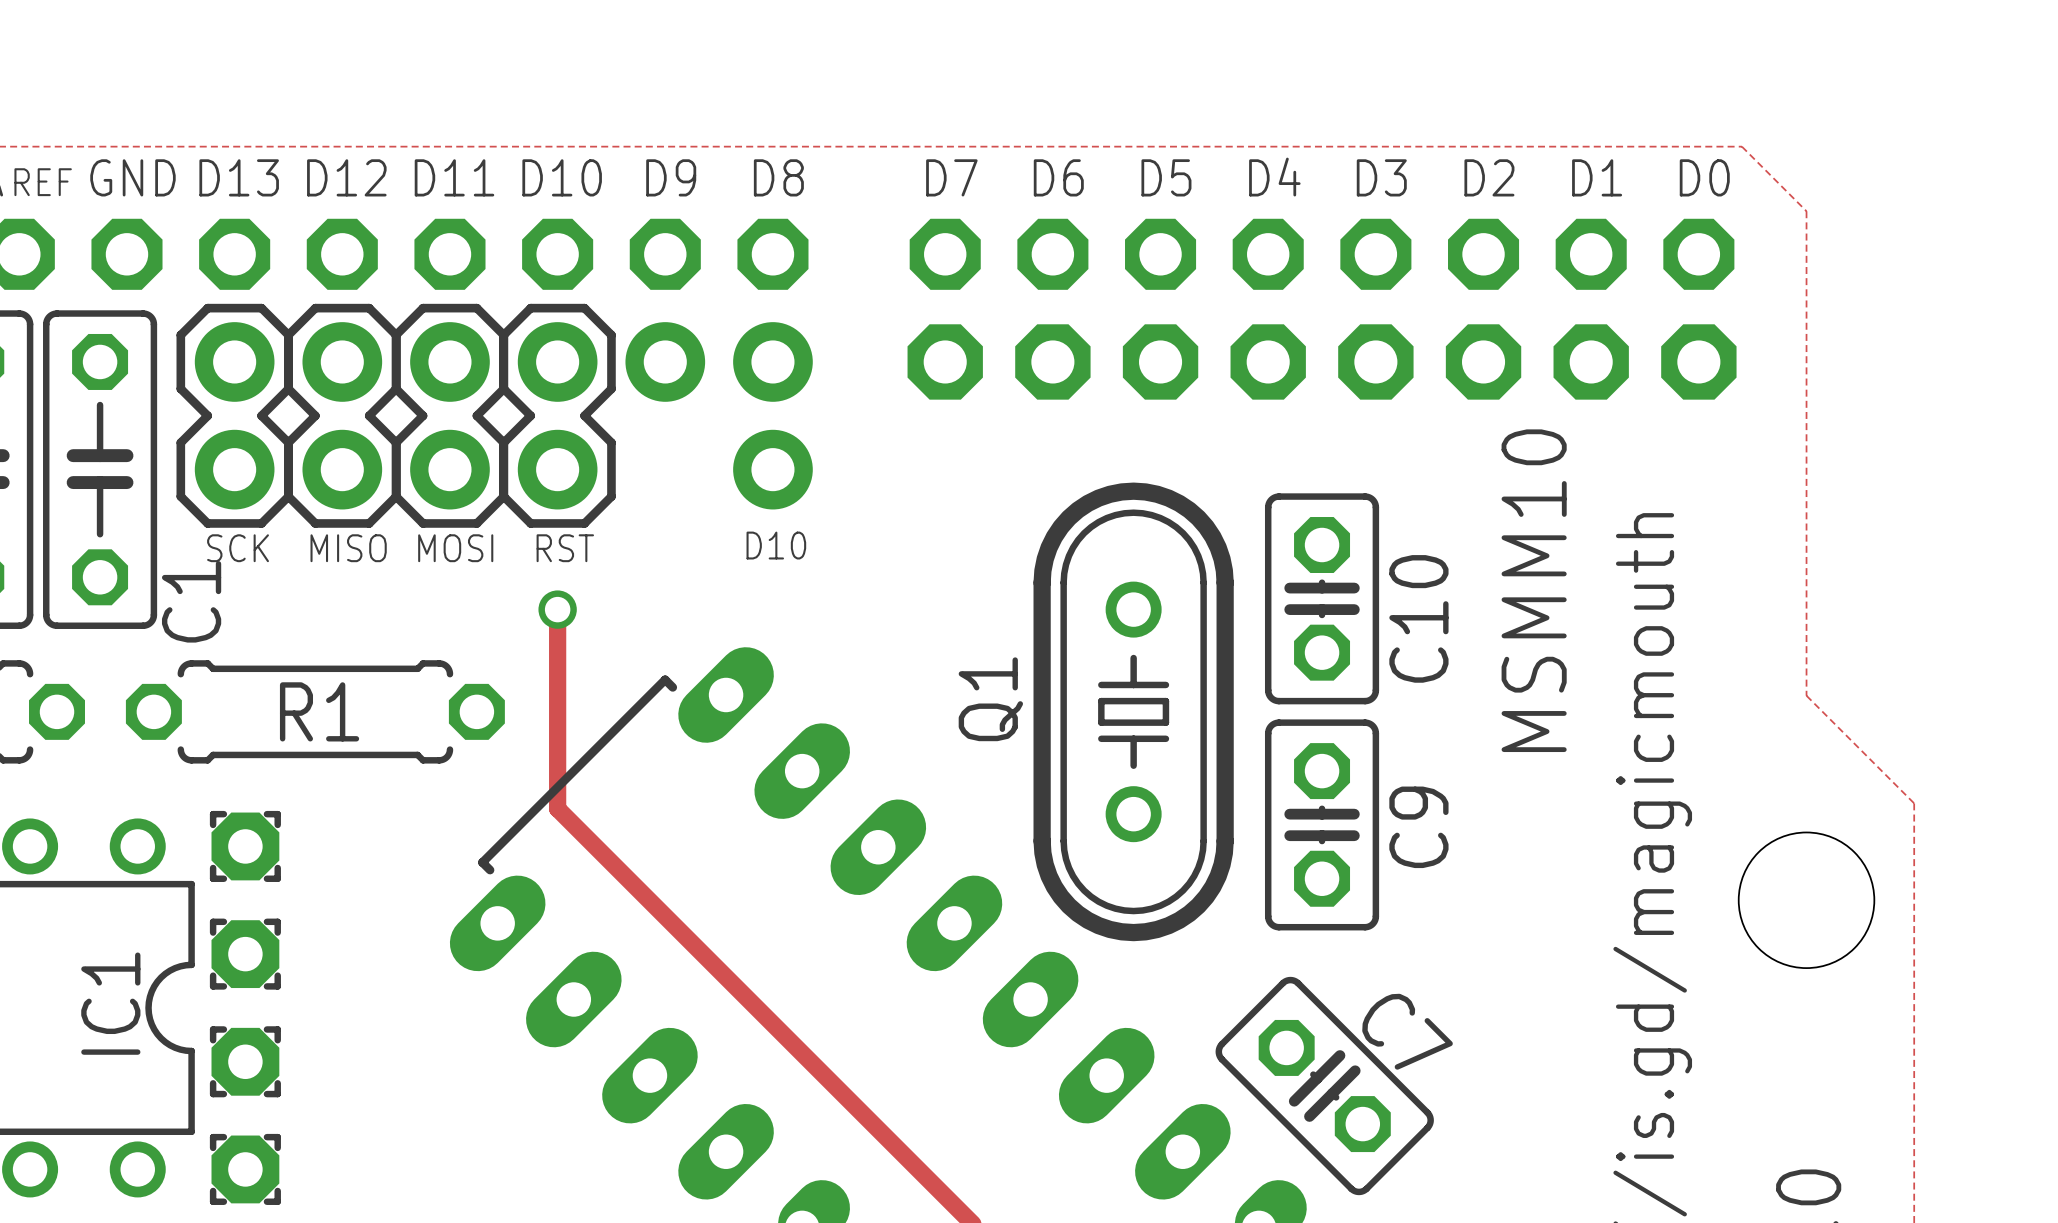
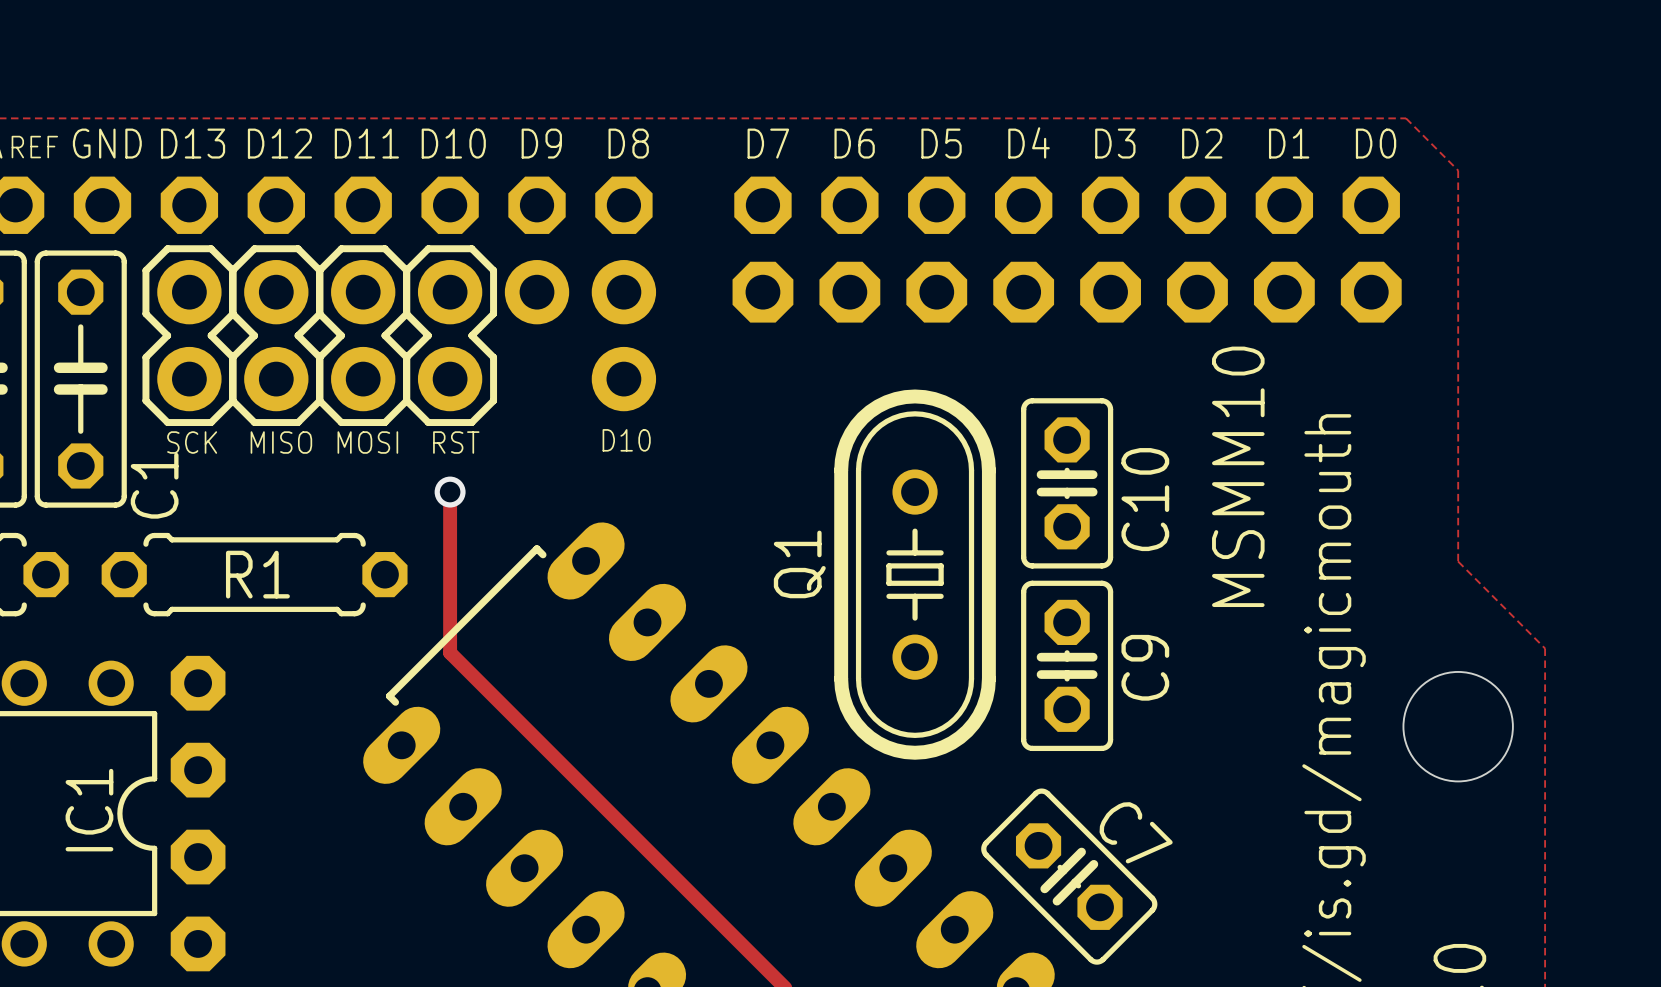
part footprint: [209, 810, 281, 882] -> [170, 655, 226, 711]
part footprint: [209, 918, 281, 990] -> [170, 742, 226, 798]
part footprint: [209, 1026, 281, 1098] -> [170, 829, 226, 885]
part footprint: [209, 1133, 281, 1205] -> [170, 916, 226, 972]

